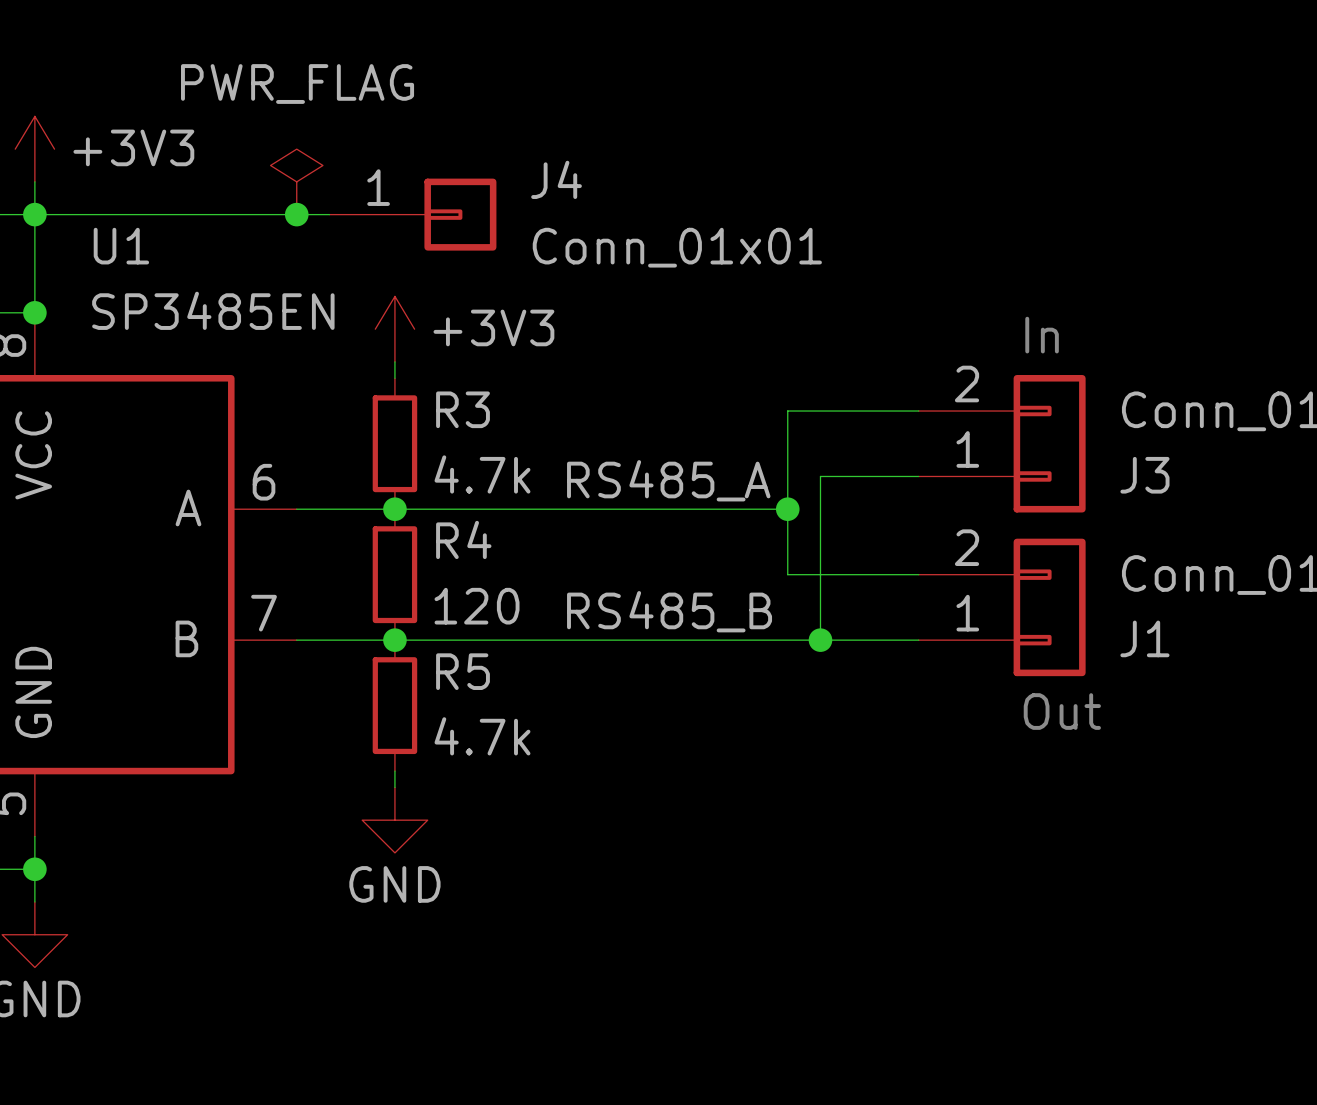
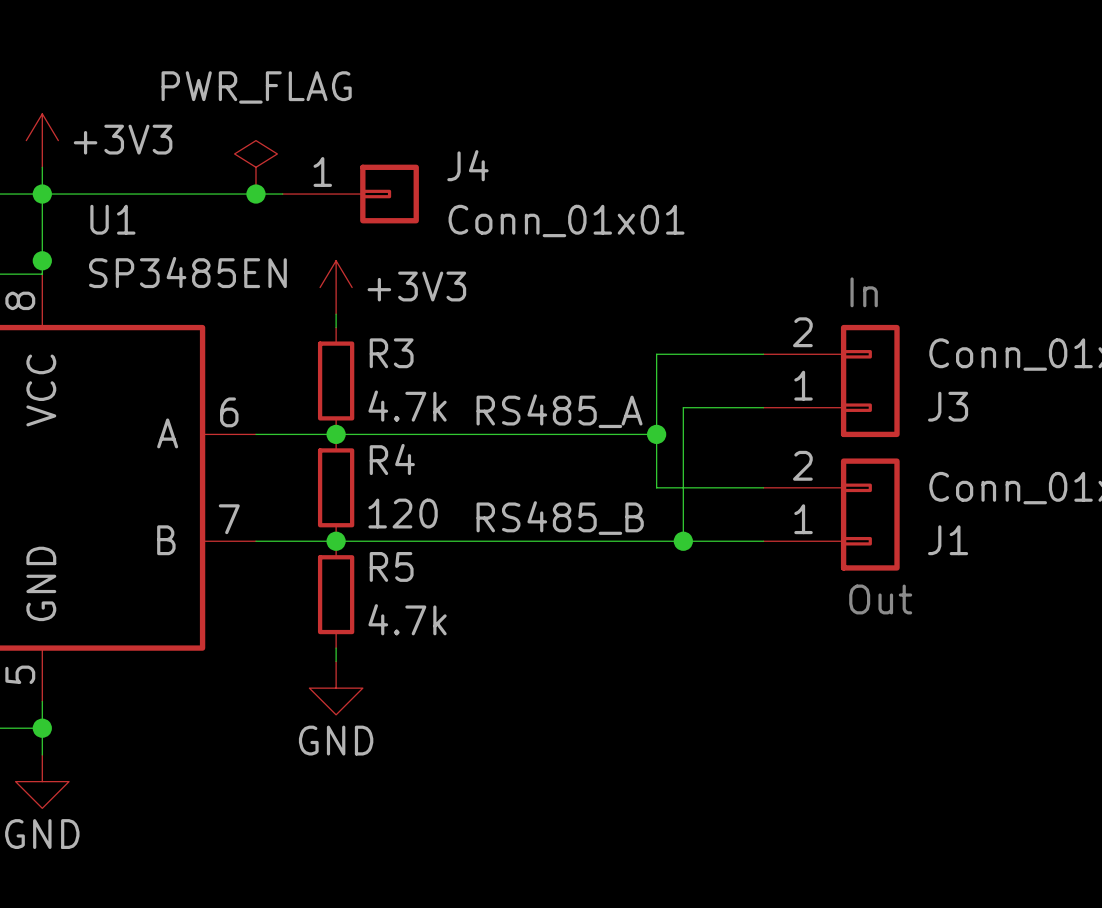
junction position: (34, 312) -> (42, 260)

